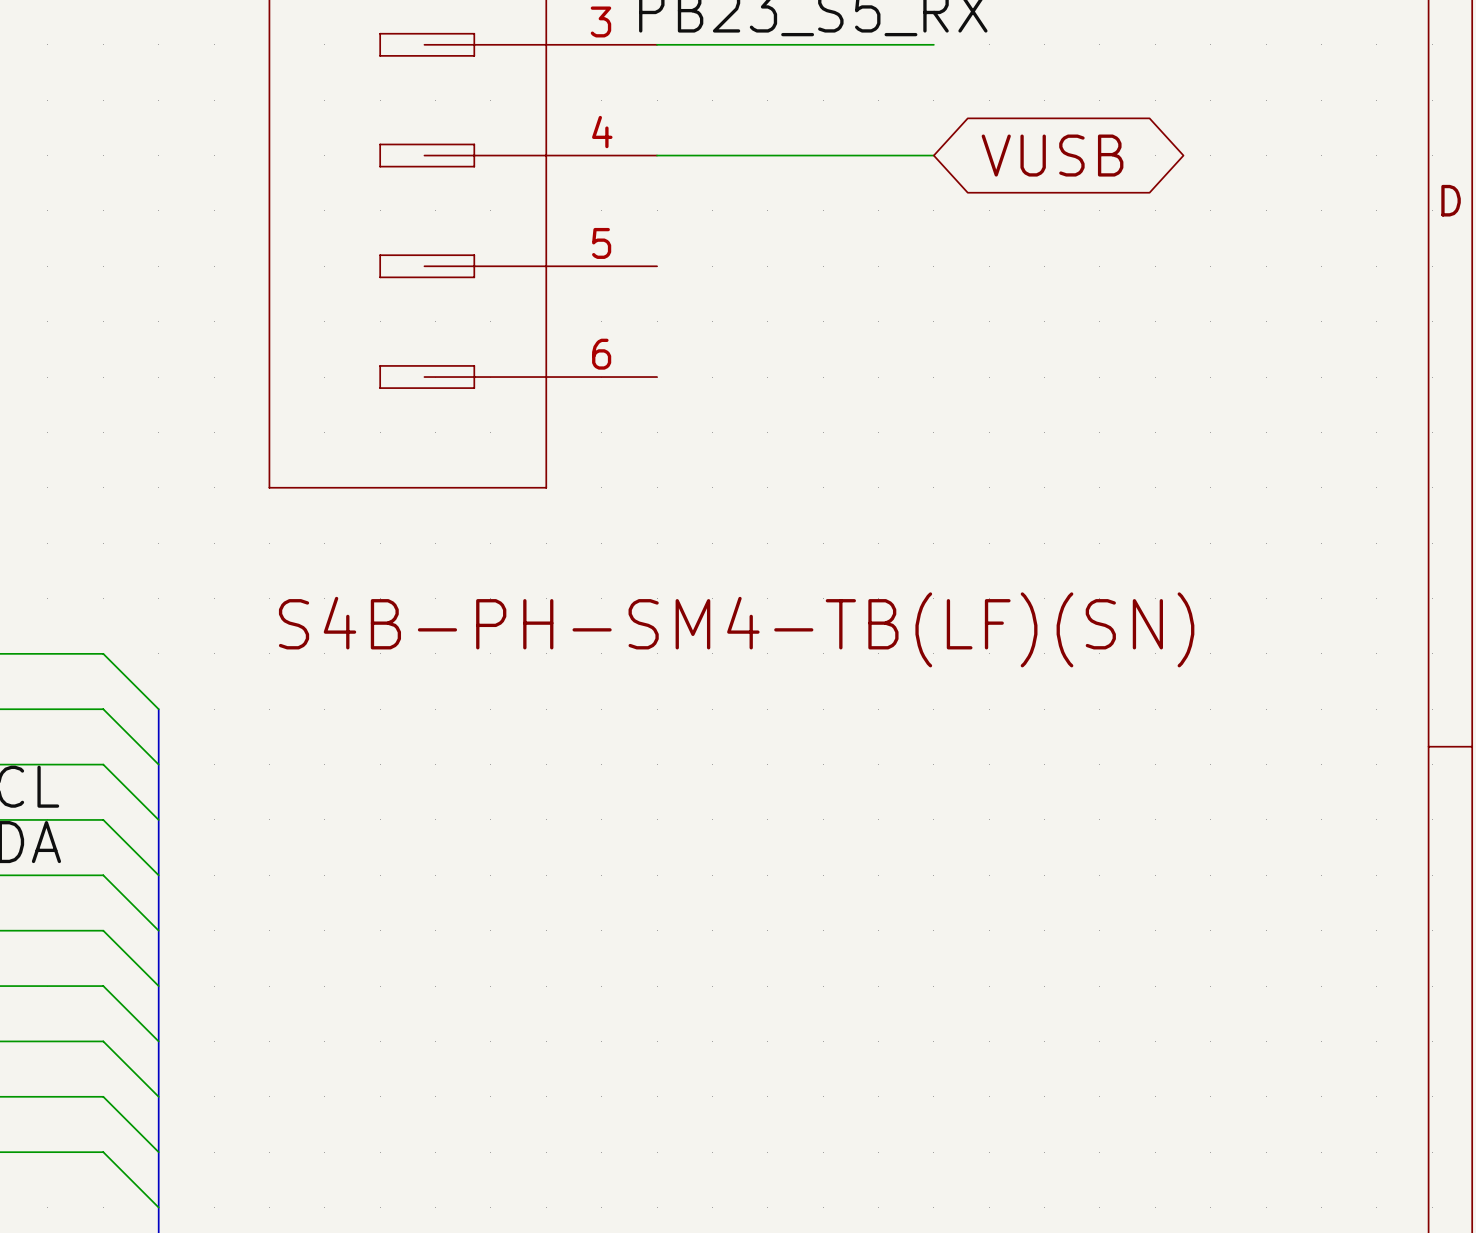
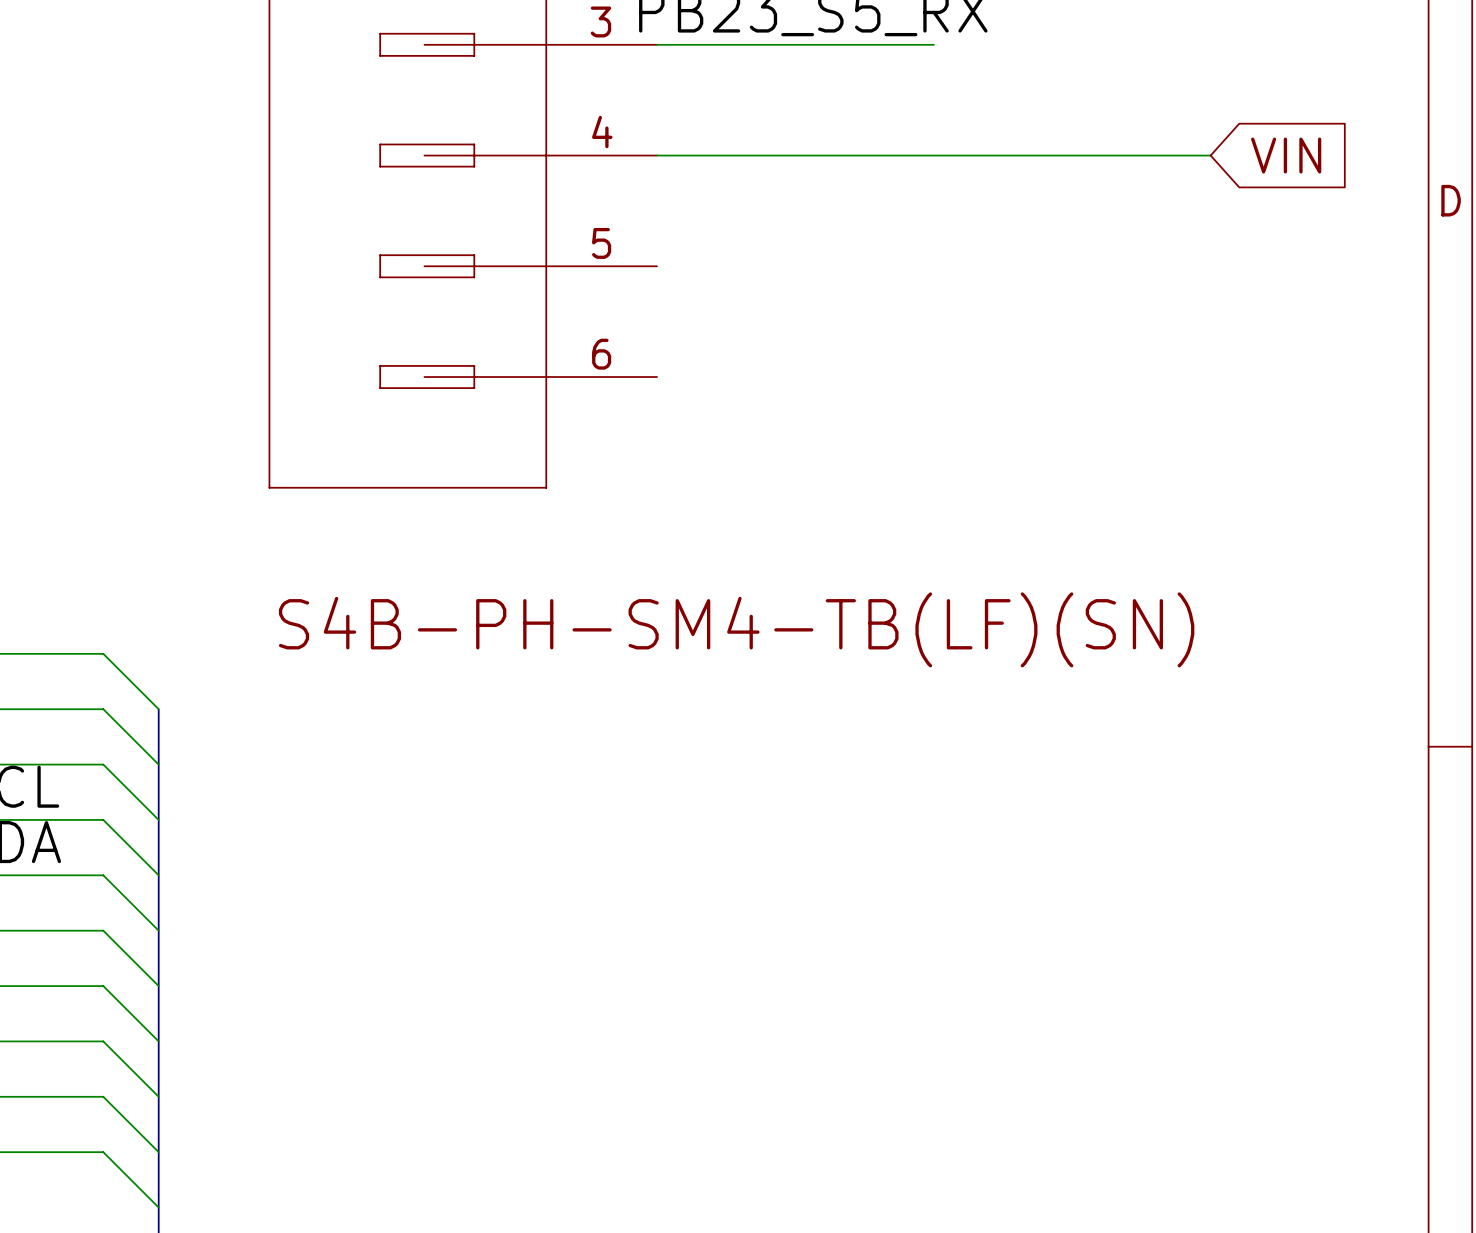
wire: none -> (933, 155) (1210, 155)
global label: VUSB (1052, 155) -> none
global label: none -> VIN (1286, 155)

